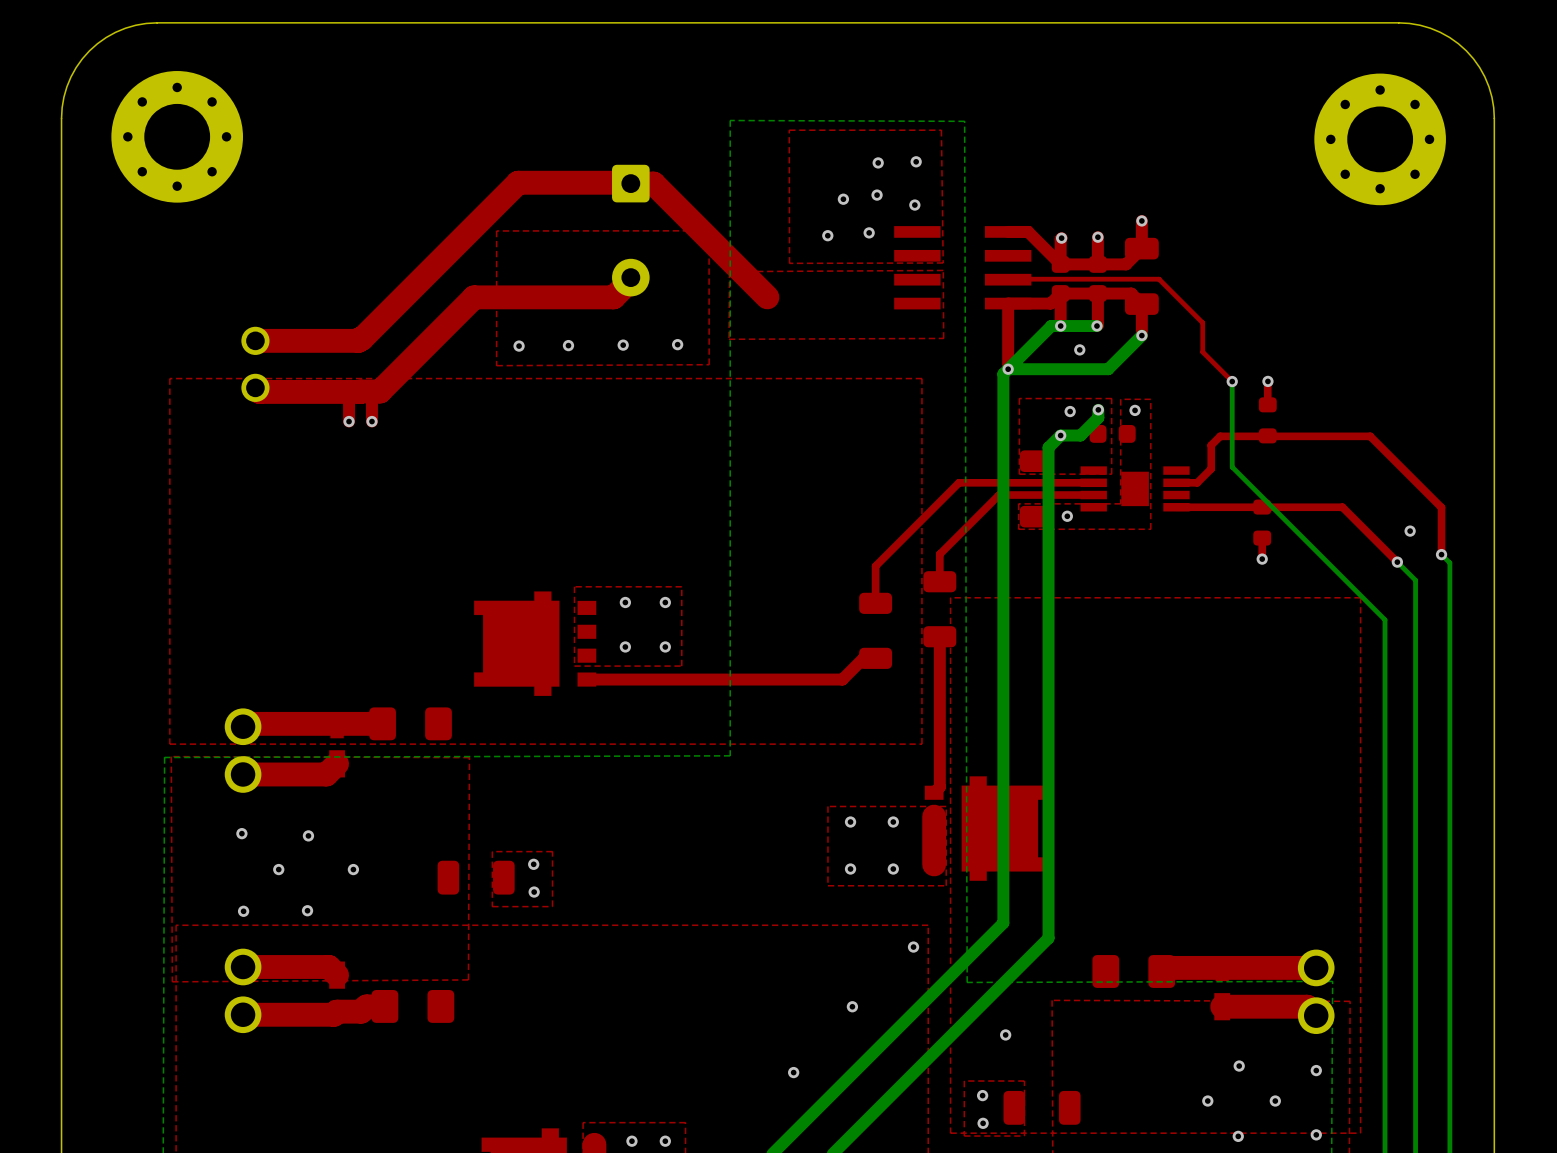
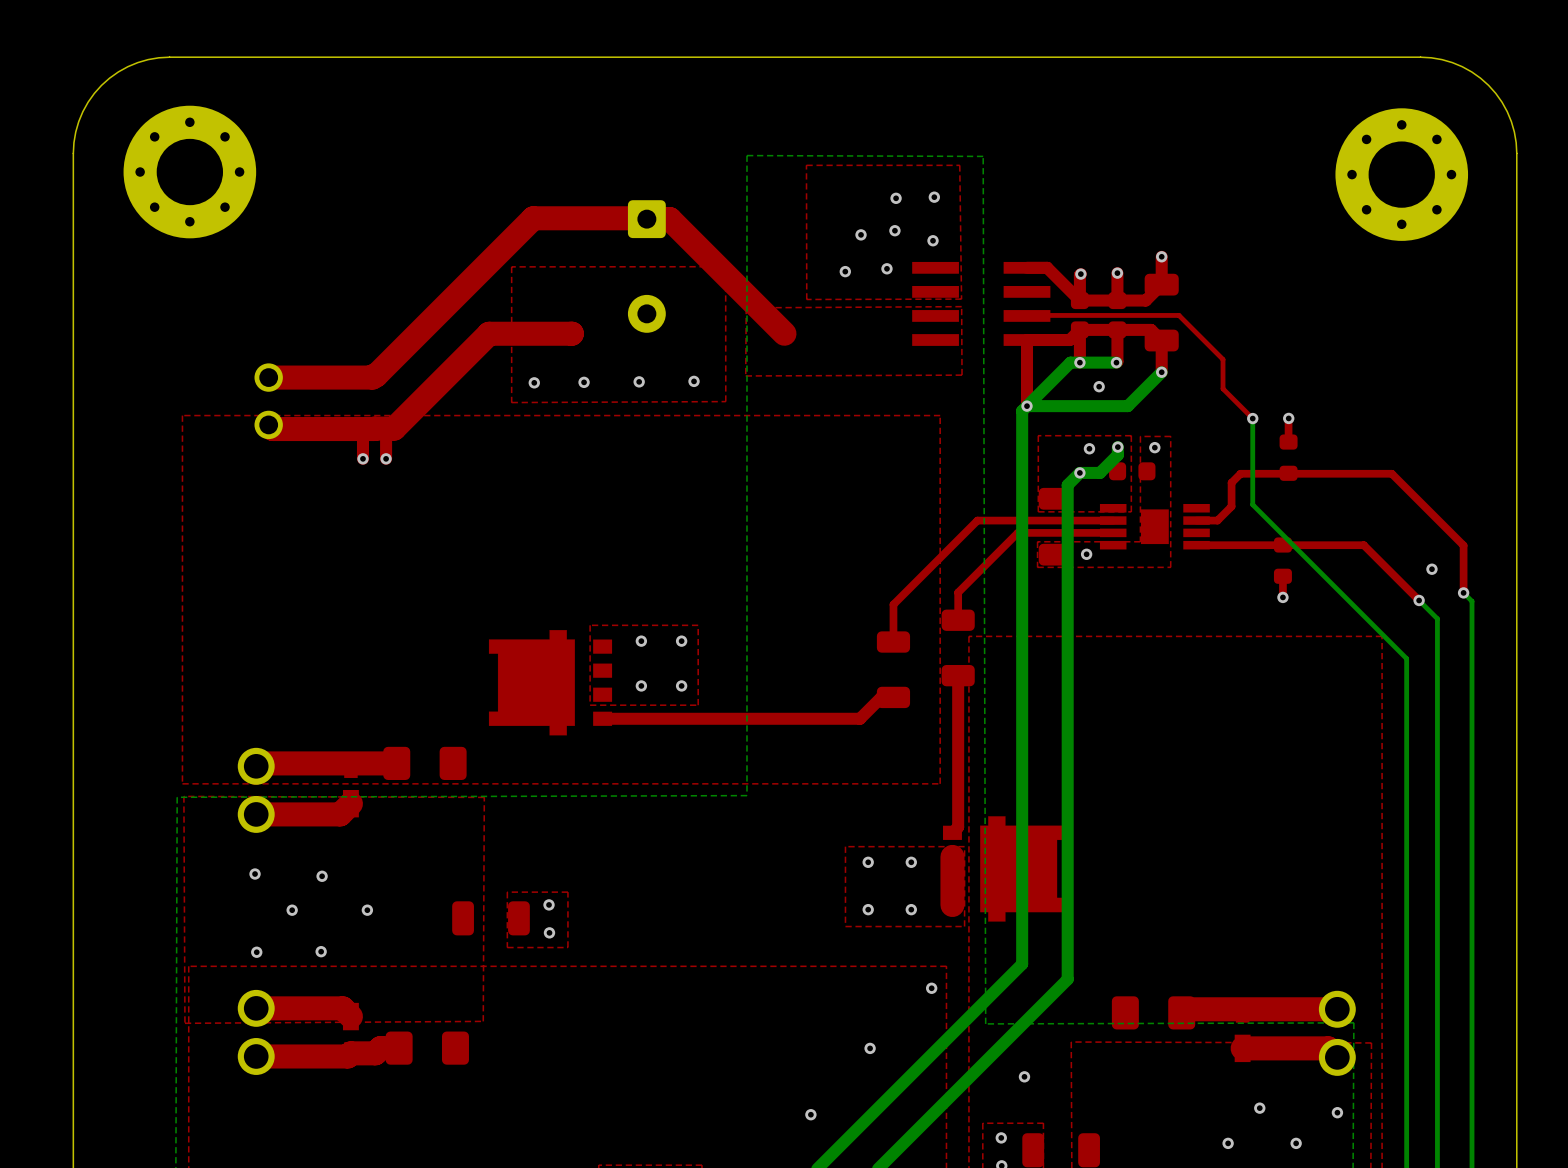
top track: (630, 280) (613, 297) (556, 297) -> none

